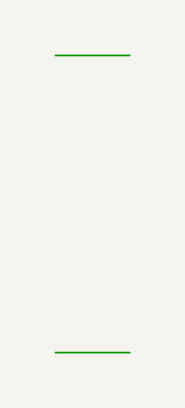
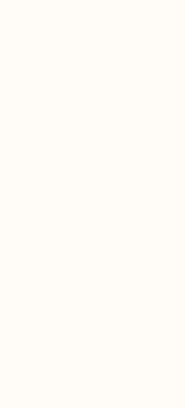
wire: (55, 55) (129, 55) -> none
wire: (55, 352) (129, 352) -> none

